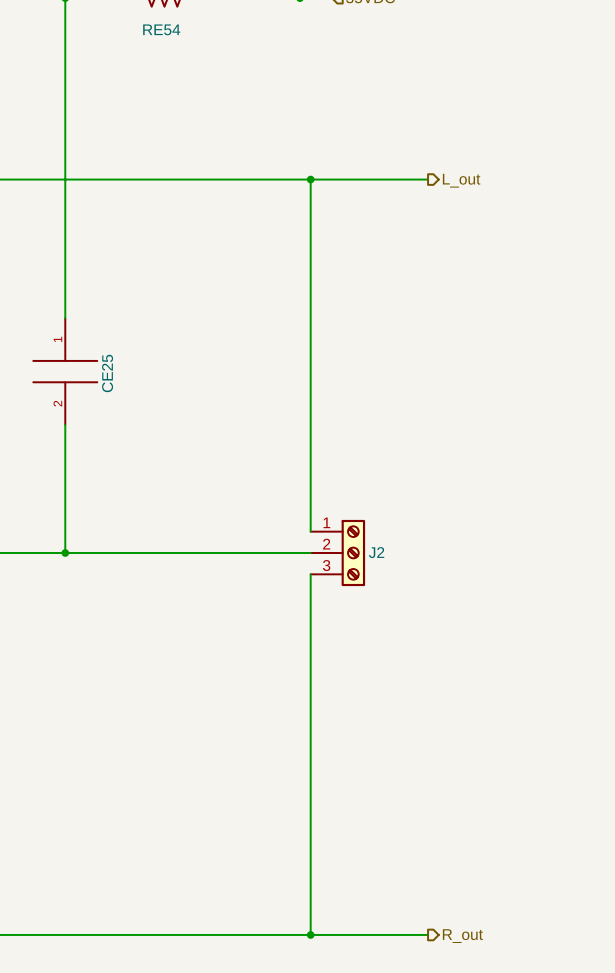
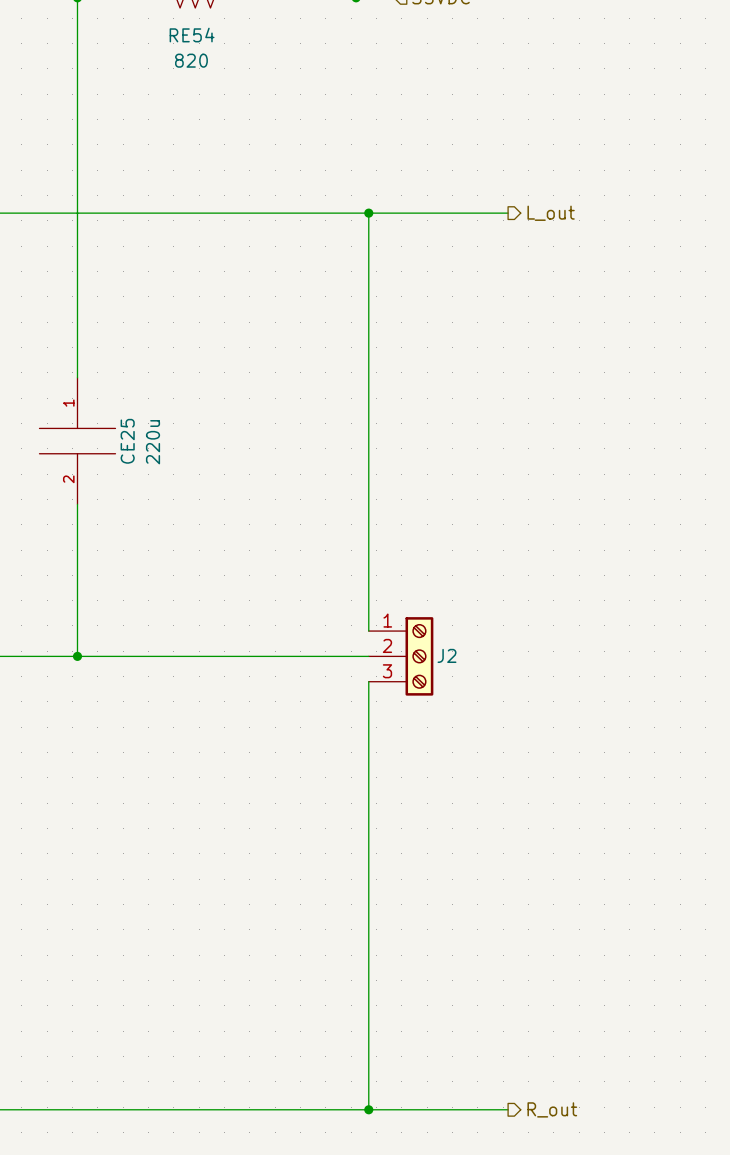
RE54 value: none -> 820 (191, 60)
CE25 value: none -> 220u (153, 442)

